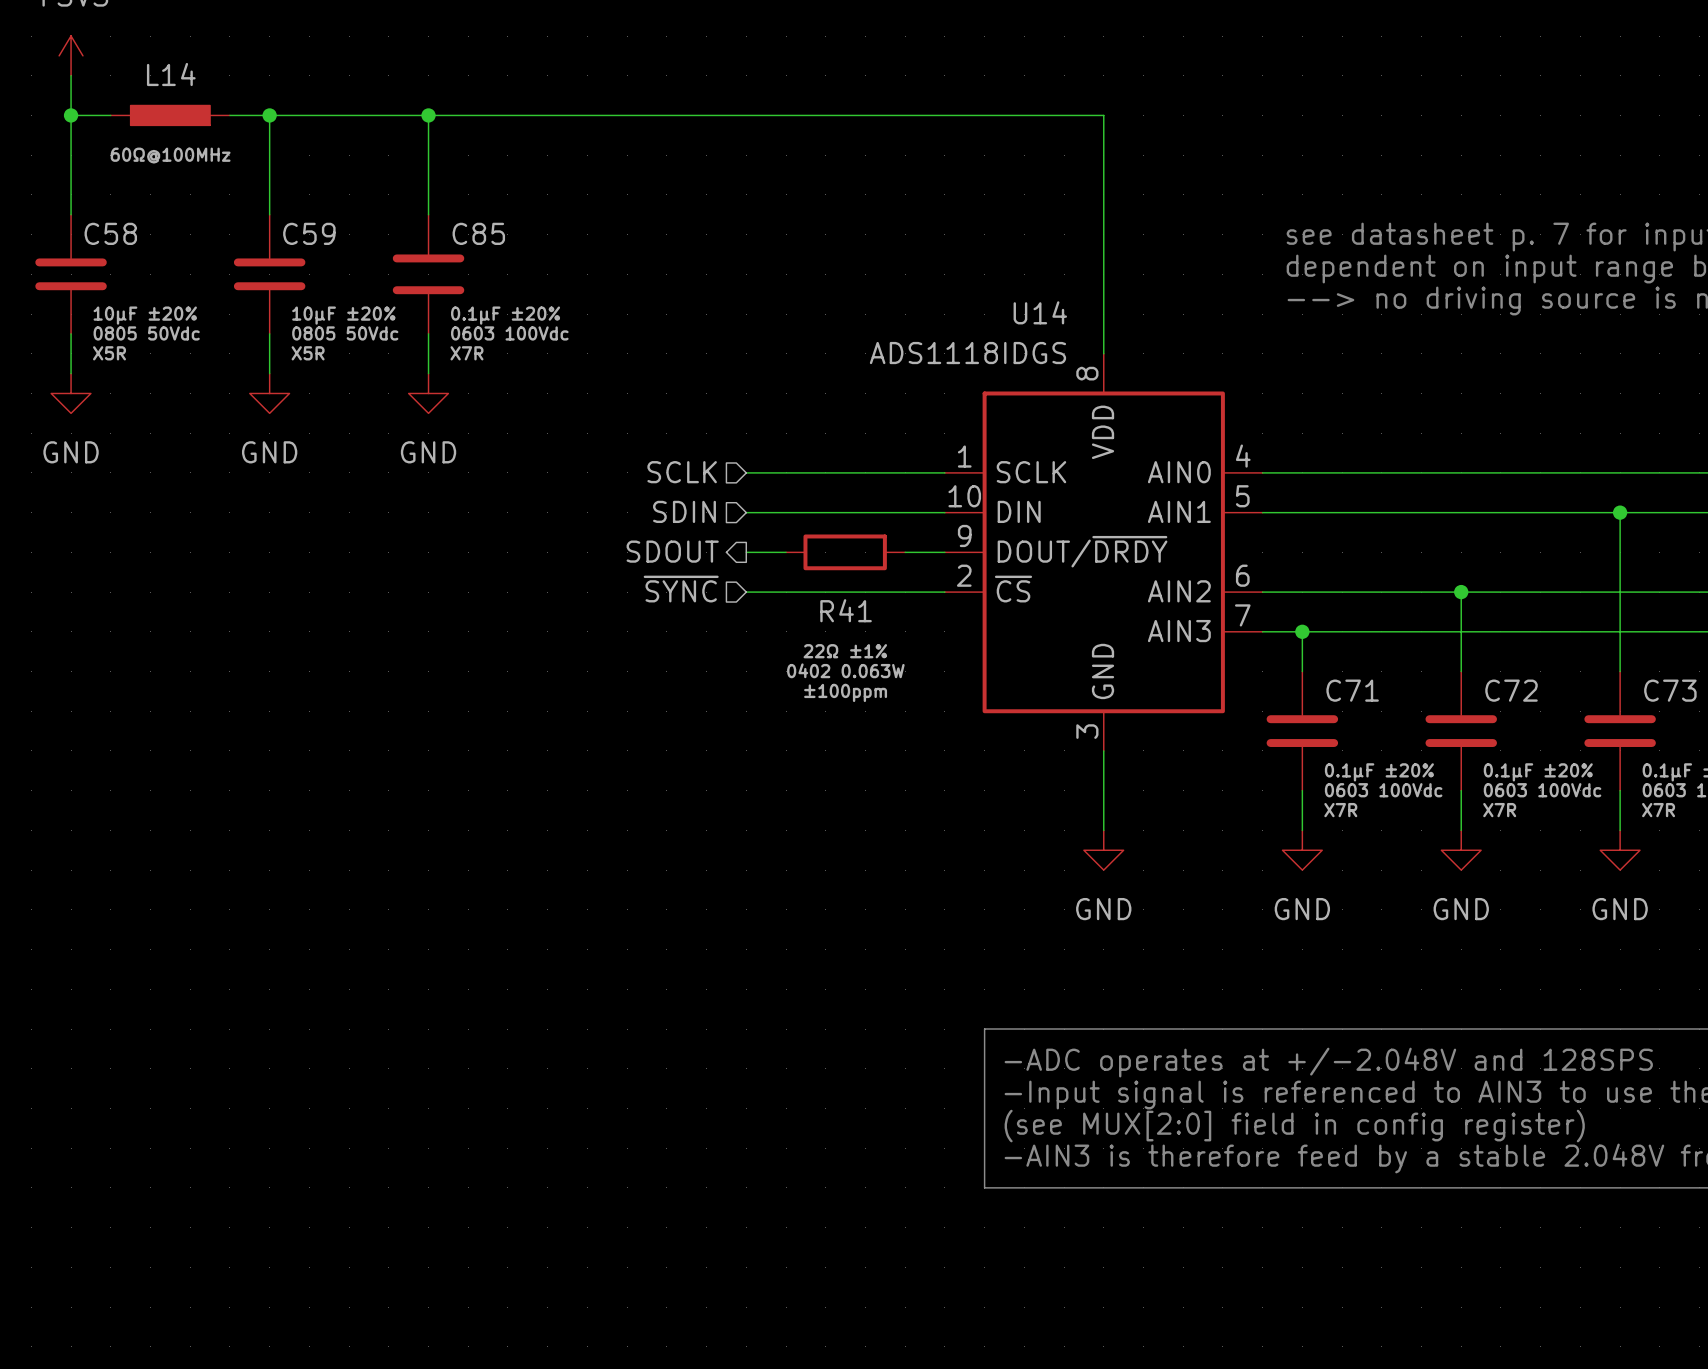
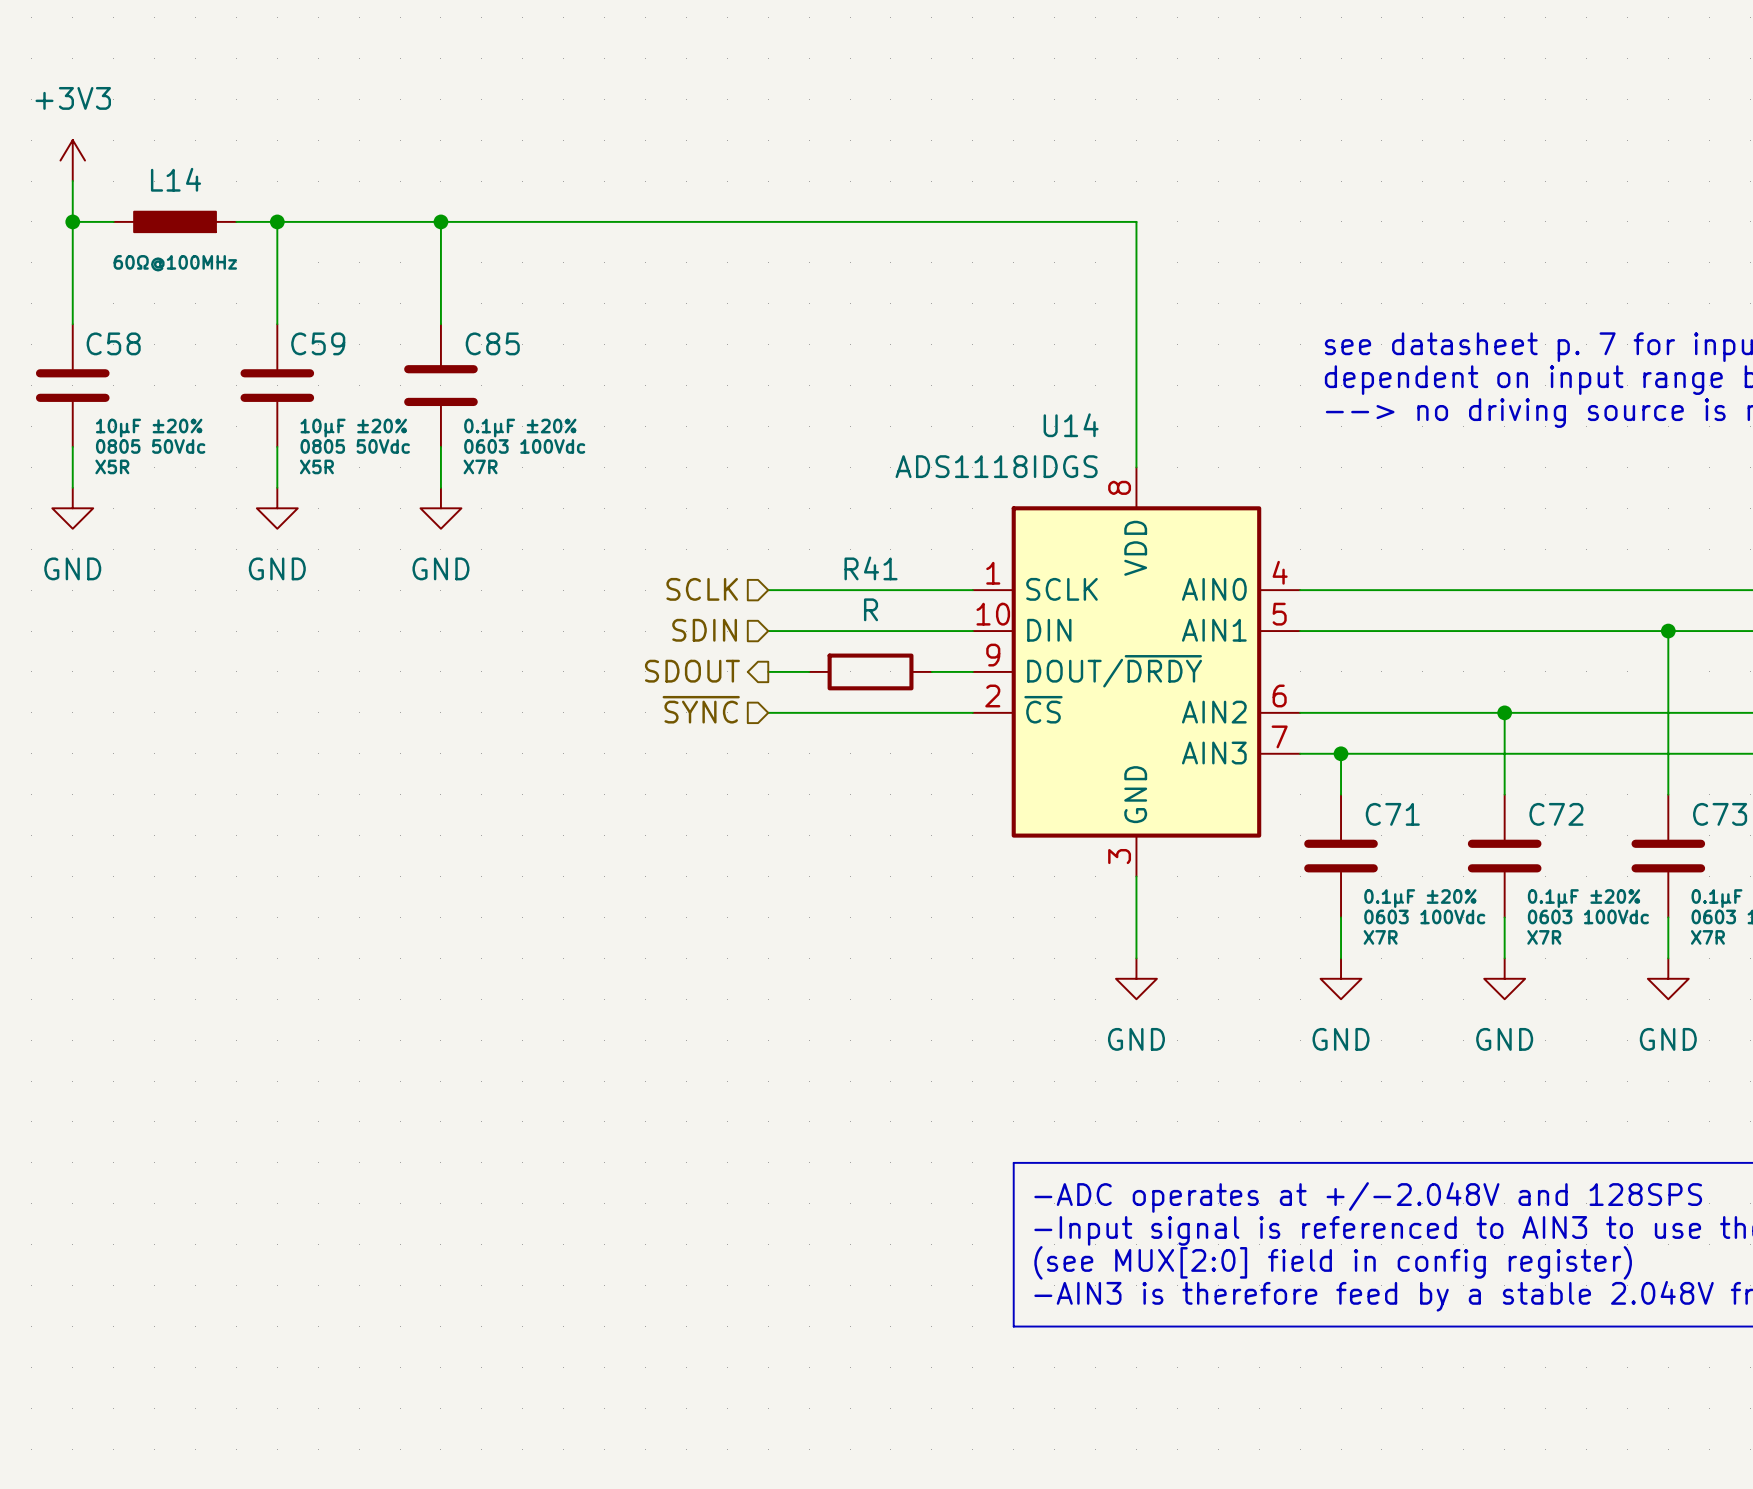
R41 value: none -> R (871, 609)
R41 name position: R41 (846, 610) -> R41 (871, 568)
R41 text: 22Ω ±1% (845, 651) -> none
R41 text: 0402 0.063W (845, 670) -> none
R41 text: ±100ppm (845, 692) -> none

